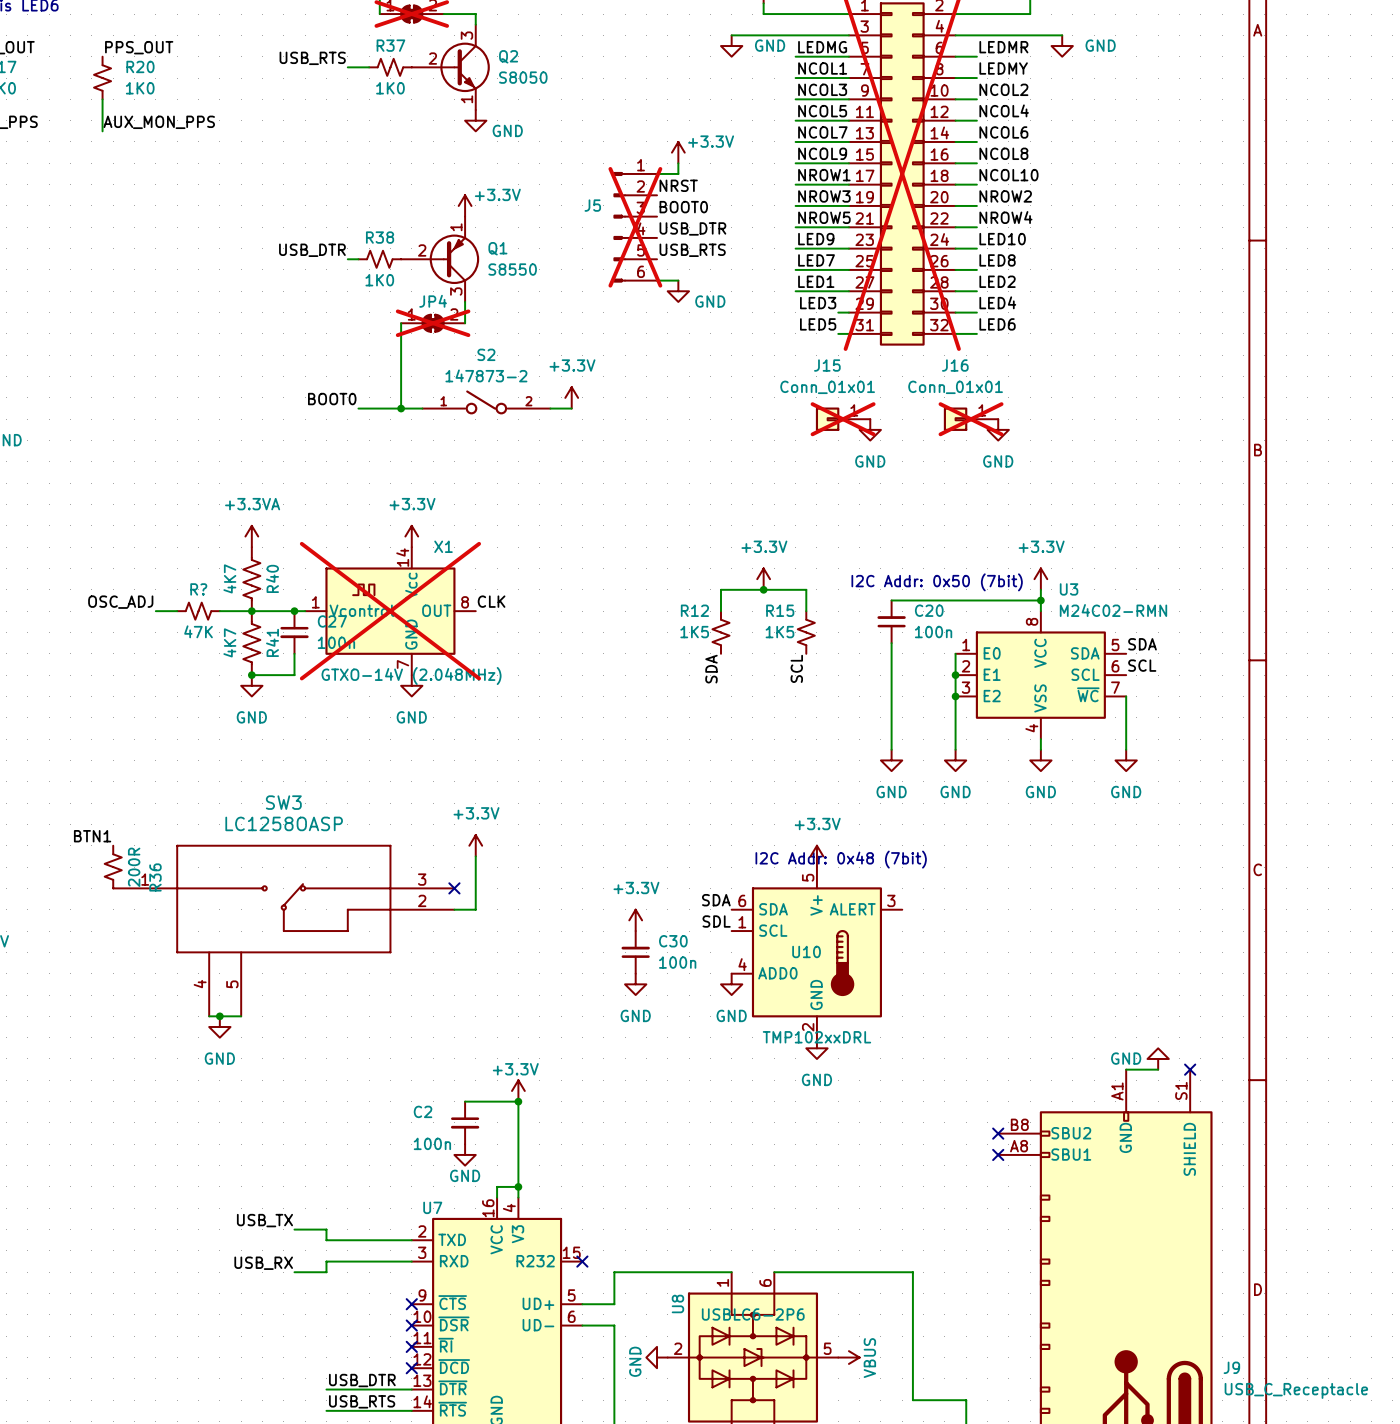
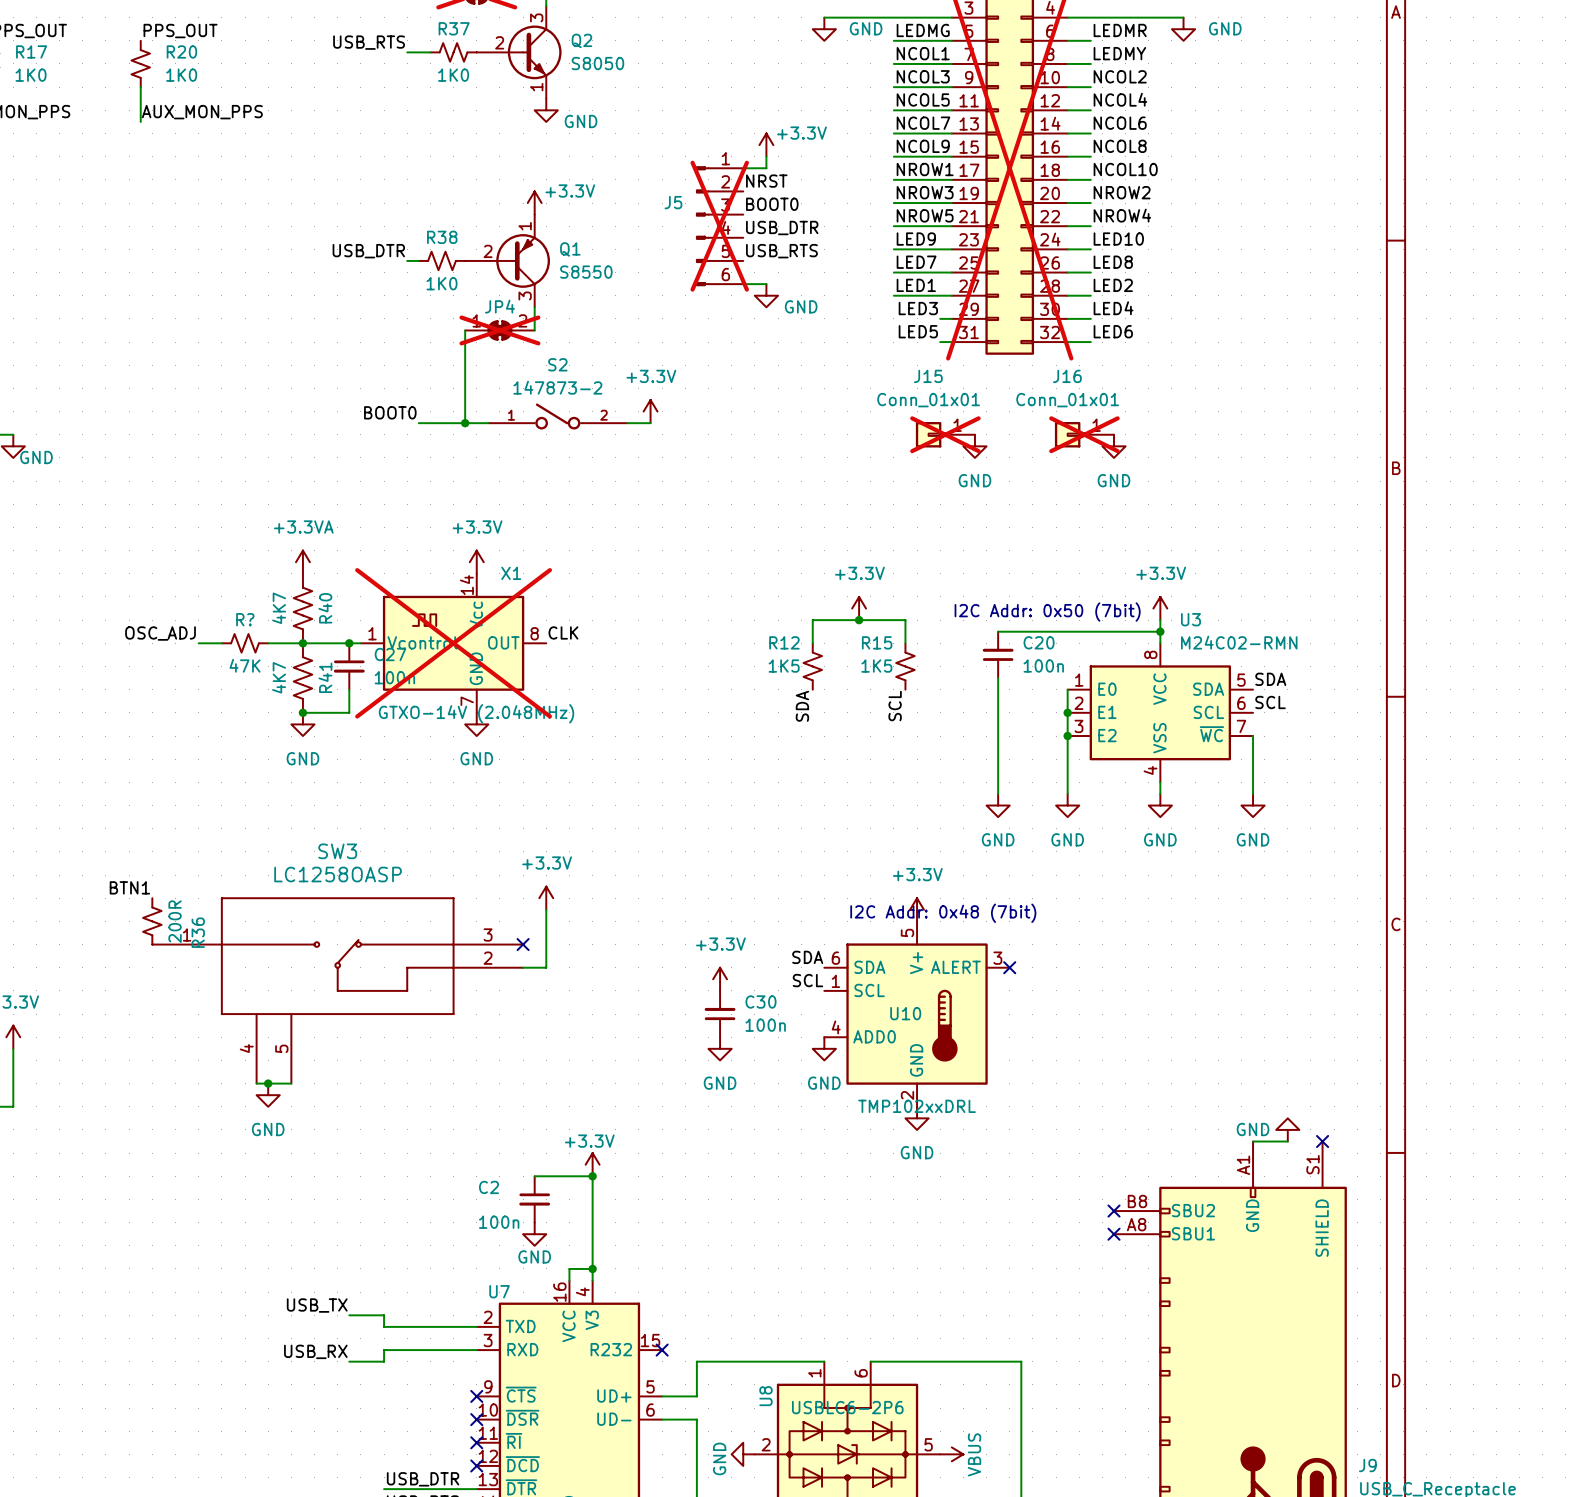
no-connect mark: none -> (1009, 967)
label: SDL (716, 921) -> SCL (807, 980)

